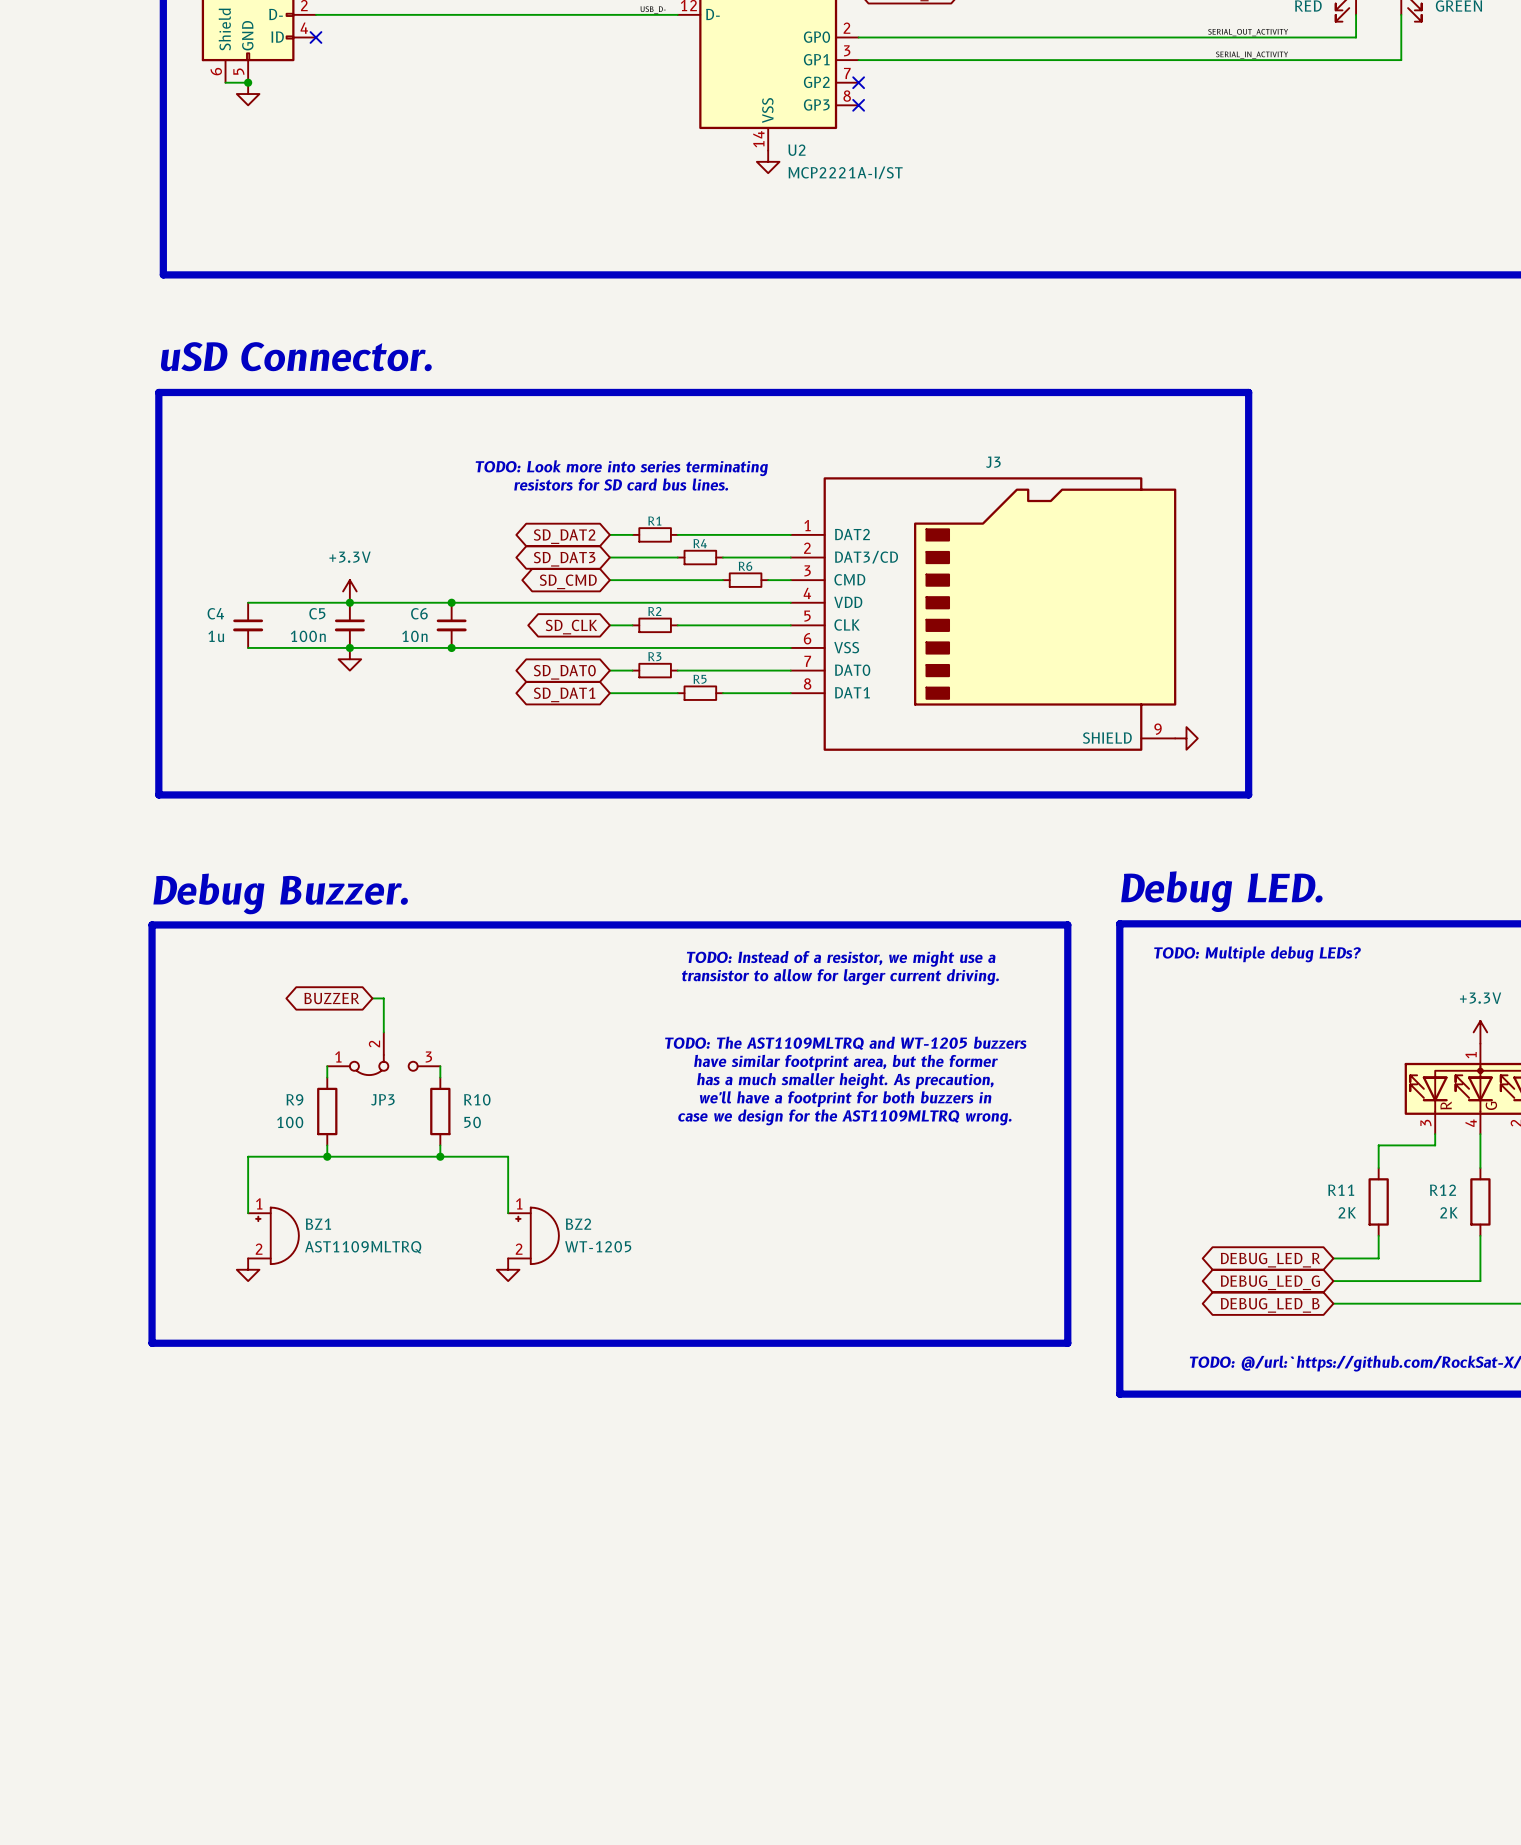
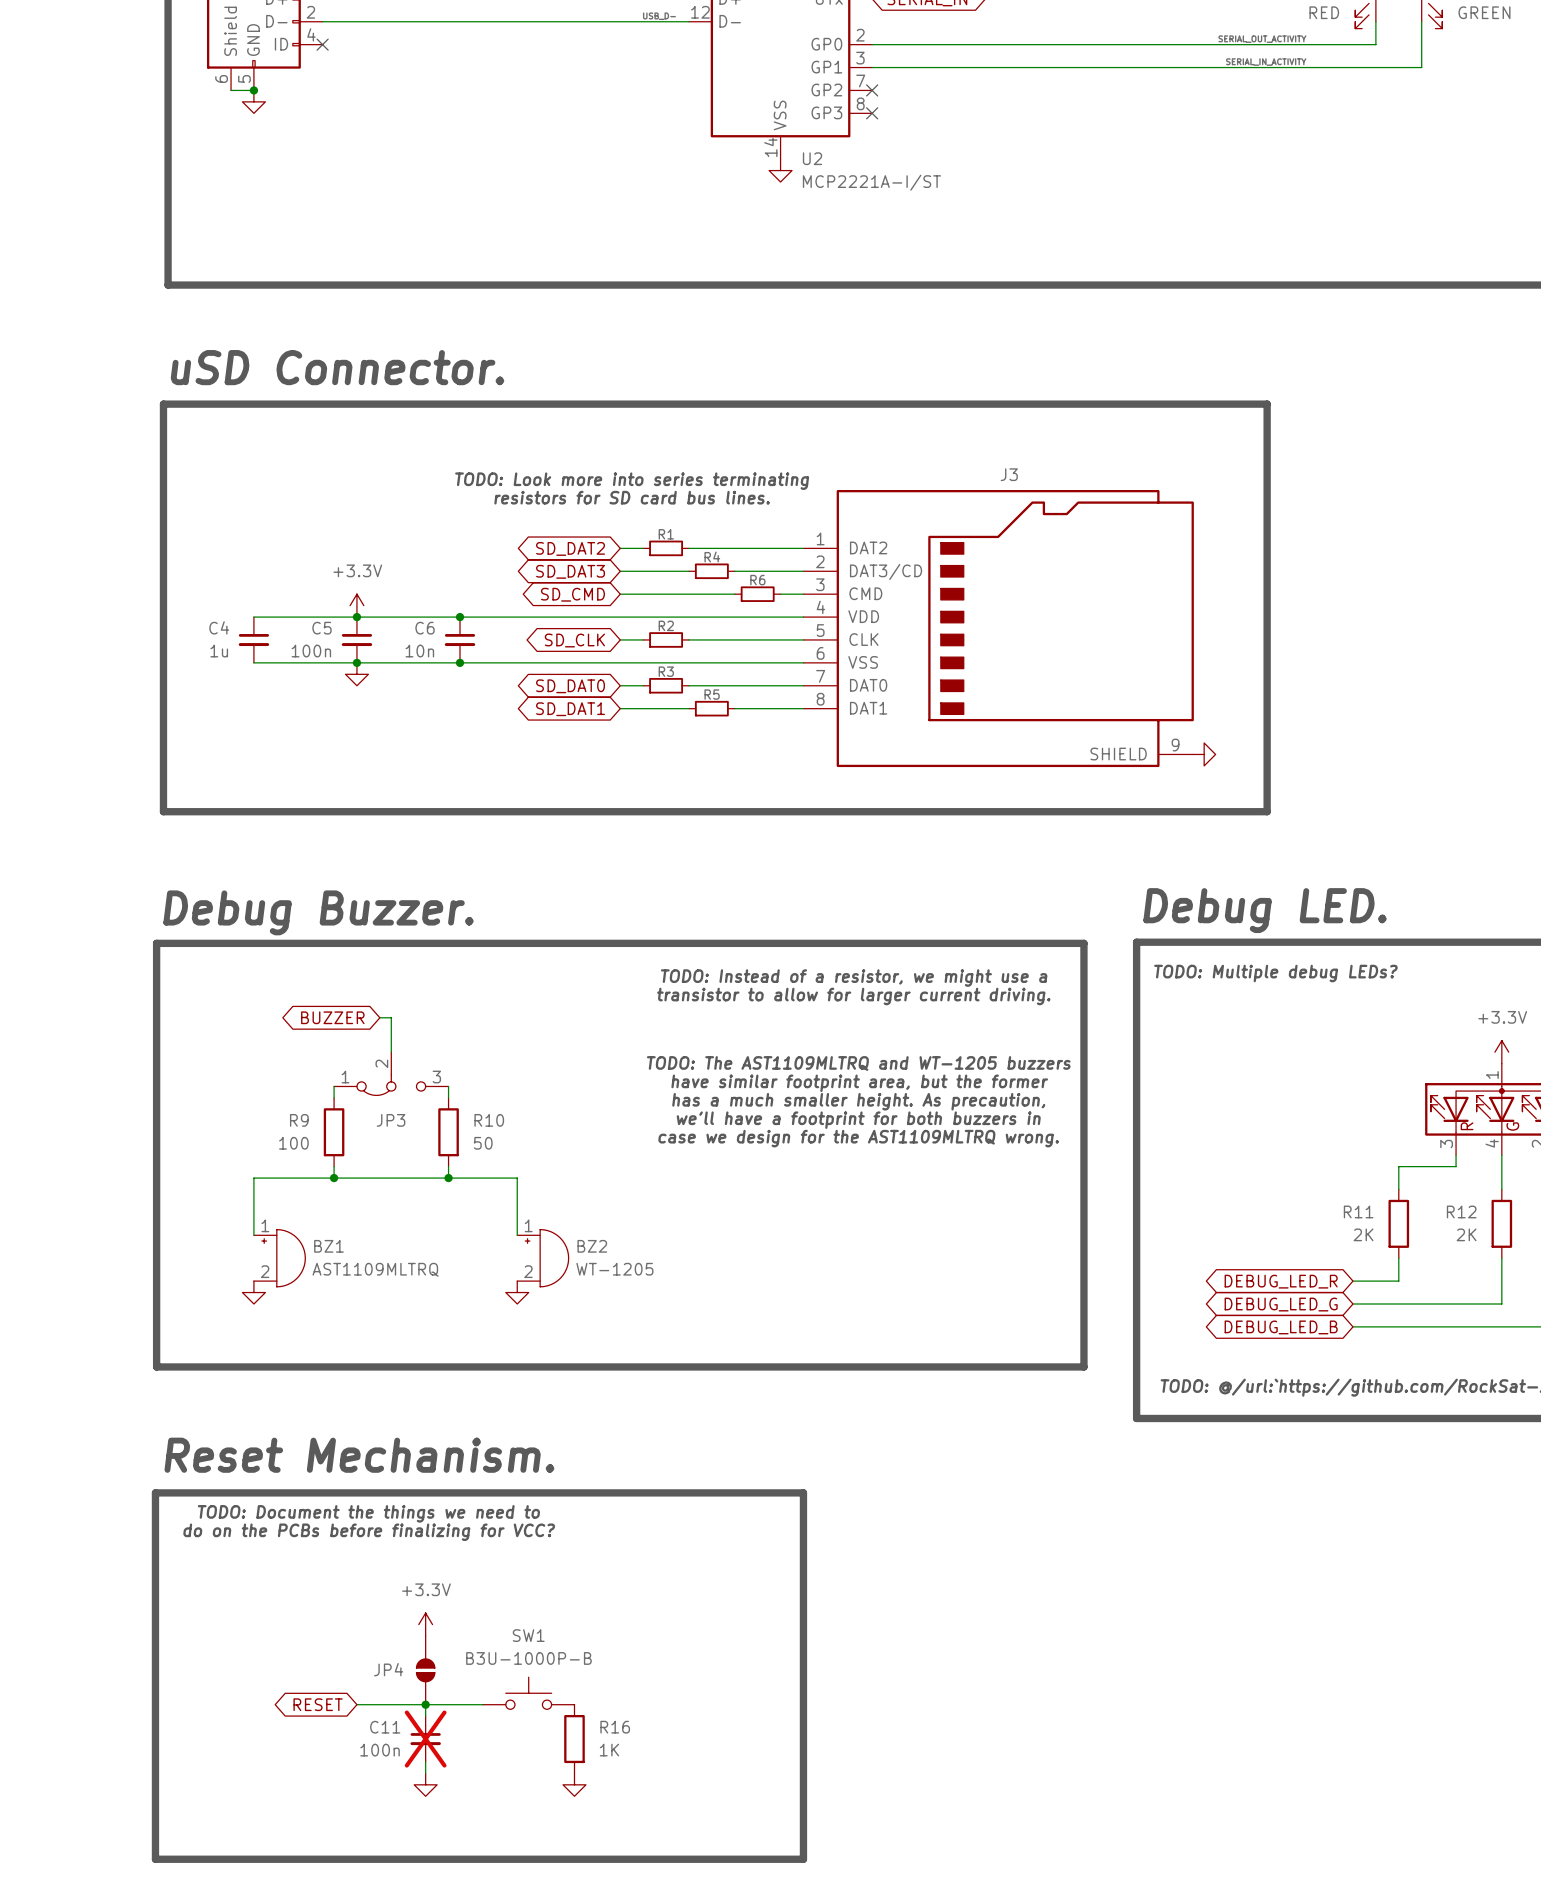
text: none -> Reset Mechanism. (359, 1455)
line: none -> (155, 1492) (803, 1492) (803, 1859) (155, 1859) (155, 1492)
text: none -> TODO: Document the things we need to (368, 1513)
text: none -> do on the PCBs before finalizing for VCC? (369, 1532)
power symbol: none -> +3.3V (425, 1624)
JP4: none -> (425, 1670)
SW1: none -> B3U-1000P-B (528, 1693)
global label: none -> RESET (318, 1704)
wire: none -> (356, 1704) (482, 1704)
wire: none -> (425, 1704) (425, 1716)
junction: none -> (425, 1704)
C11: none -> 100n (425, 1739)
R16: none -> 1K (574, 1739)
wire: none -> (425, 1761) (425, 1773)
power symbol: none -> (425, 1784)
power symbol: none -> (574, 1784)

